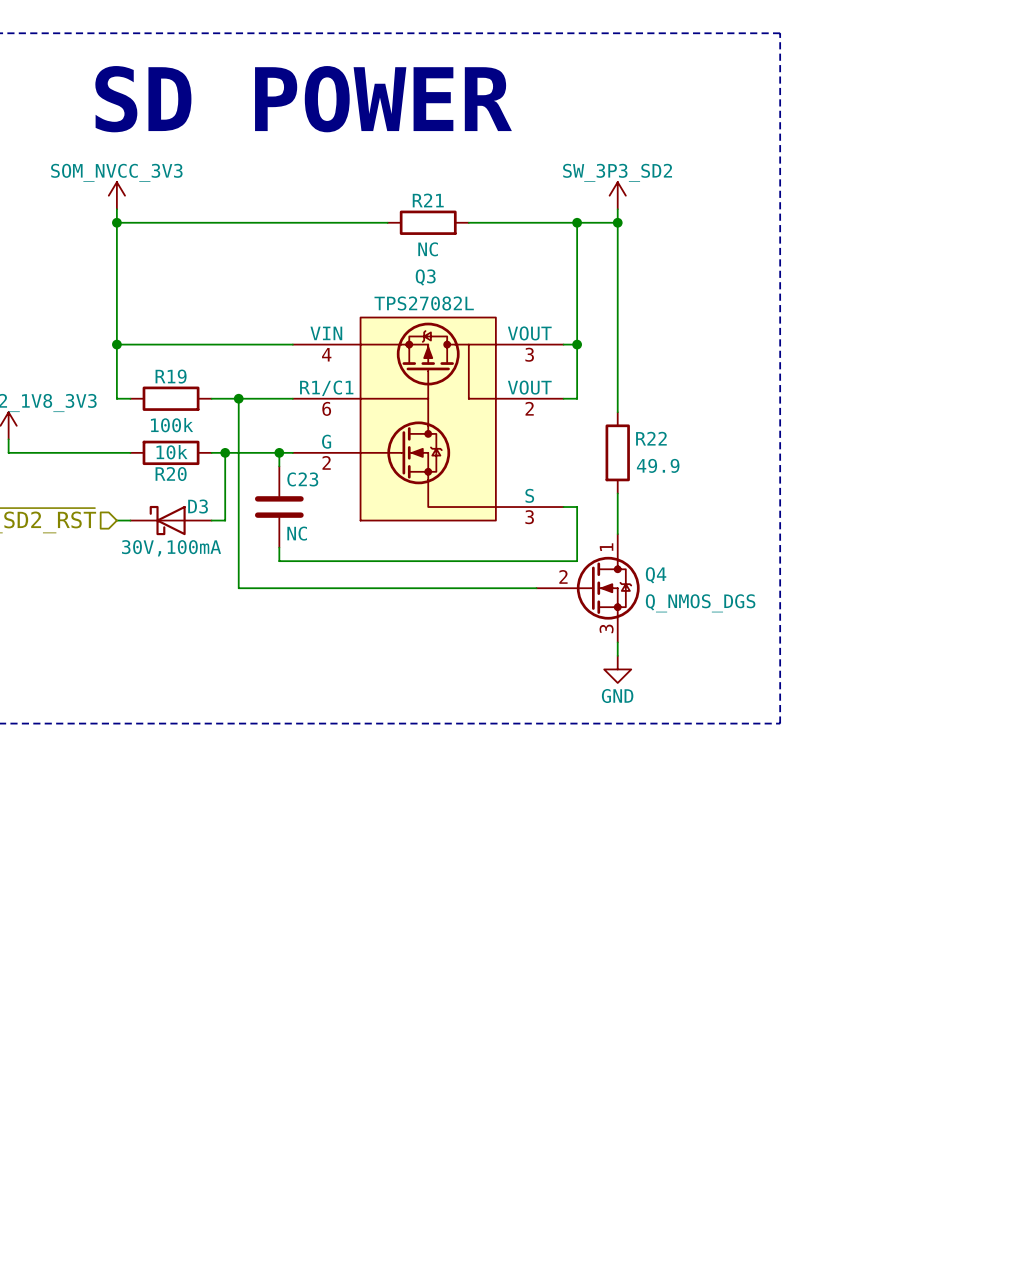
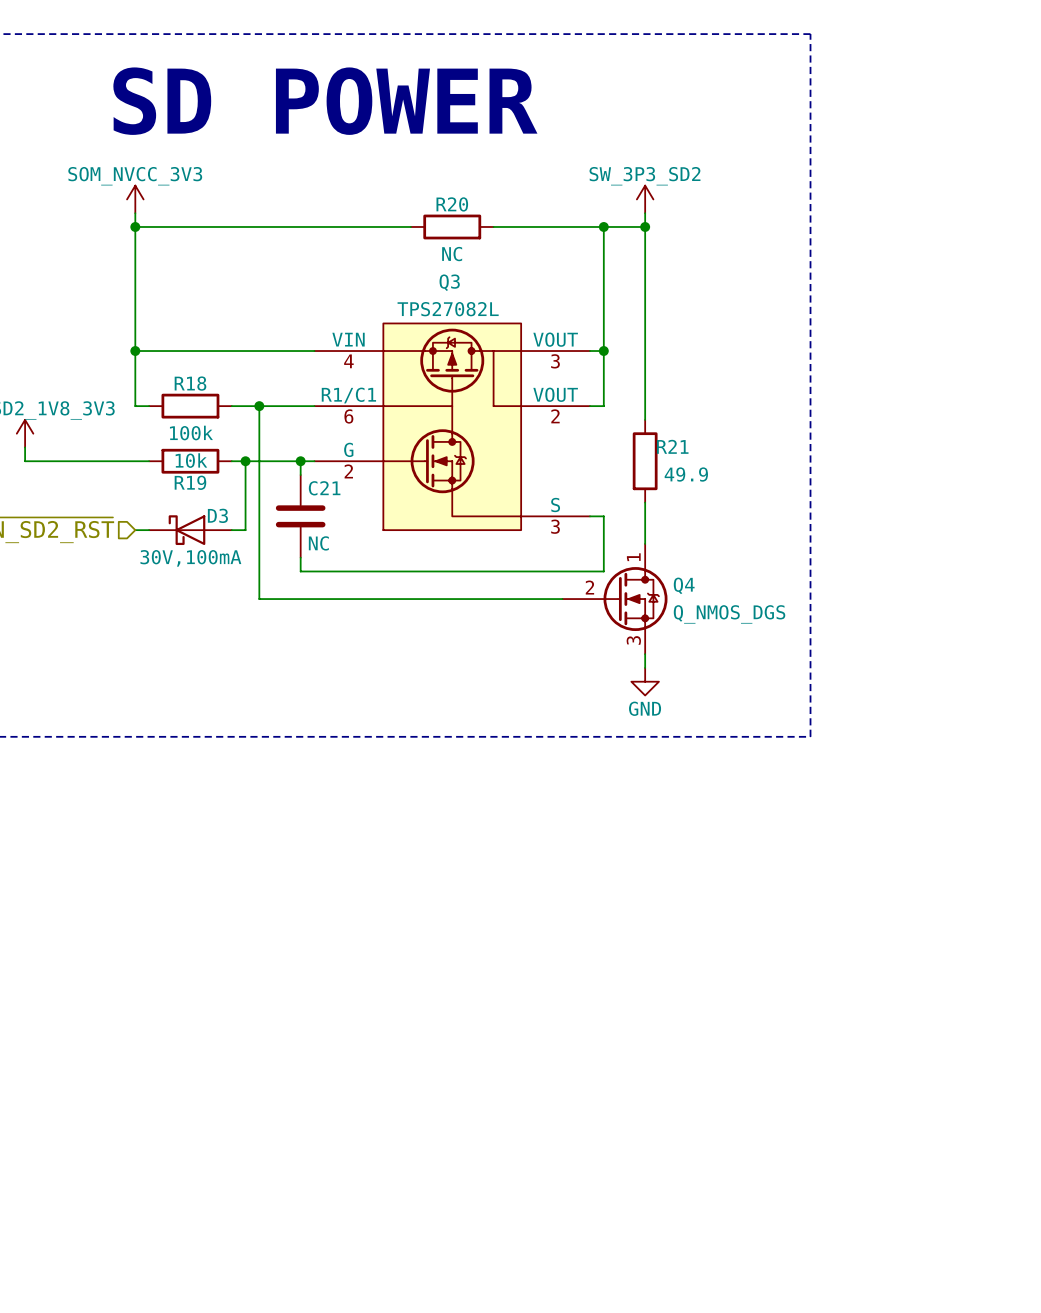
R21 name: R21 (428, 200) -> R20 (452, 204)
R19 name: R19 (171, 376) -> R18 (190, 383)
R22 name: R22 (651, 438) -> R21 (672, 446)
R20 name: R20 (171, 474) -> R19 (190, 482)
C23 name: C23 (302, 479) -> C21 (324, 488)

